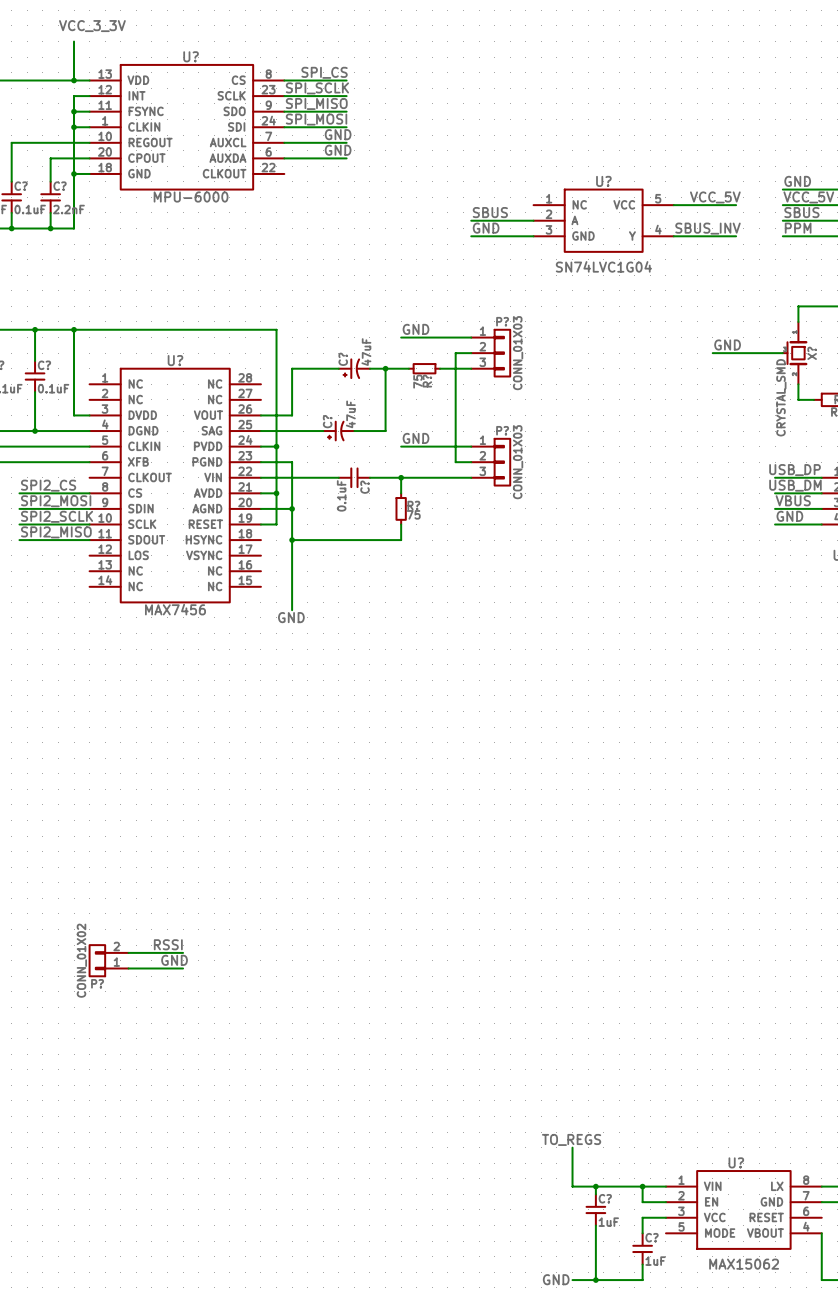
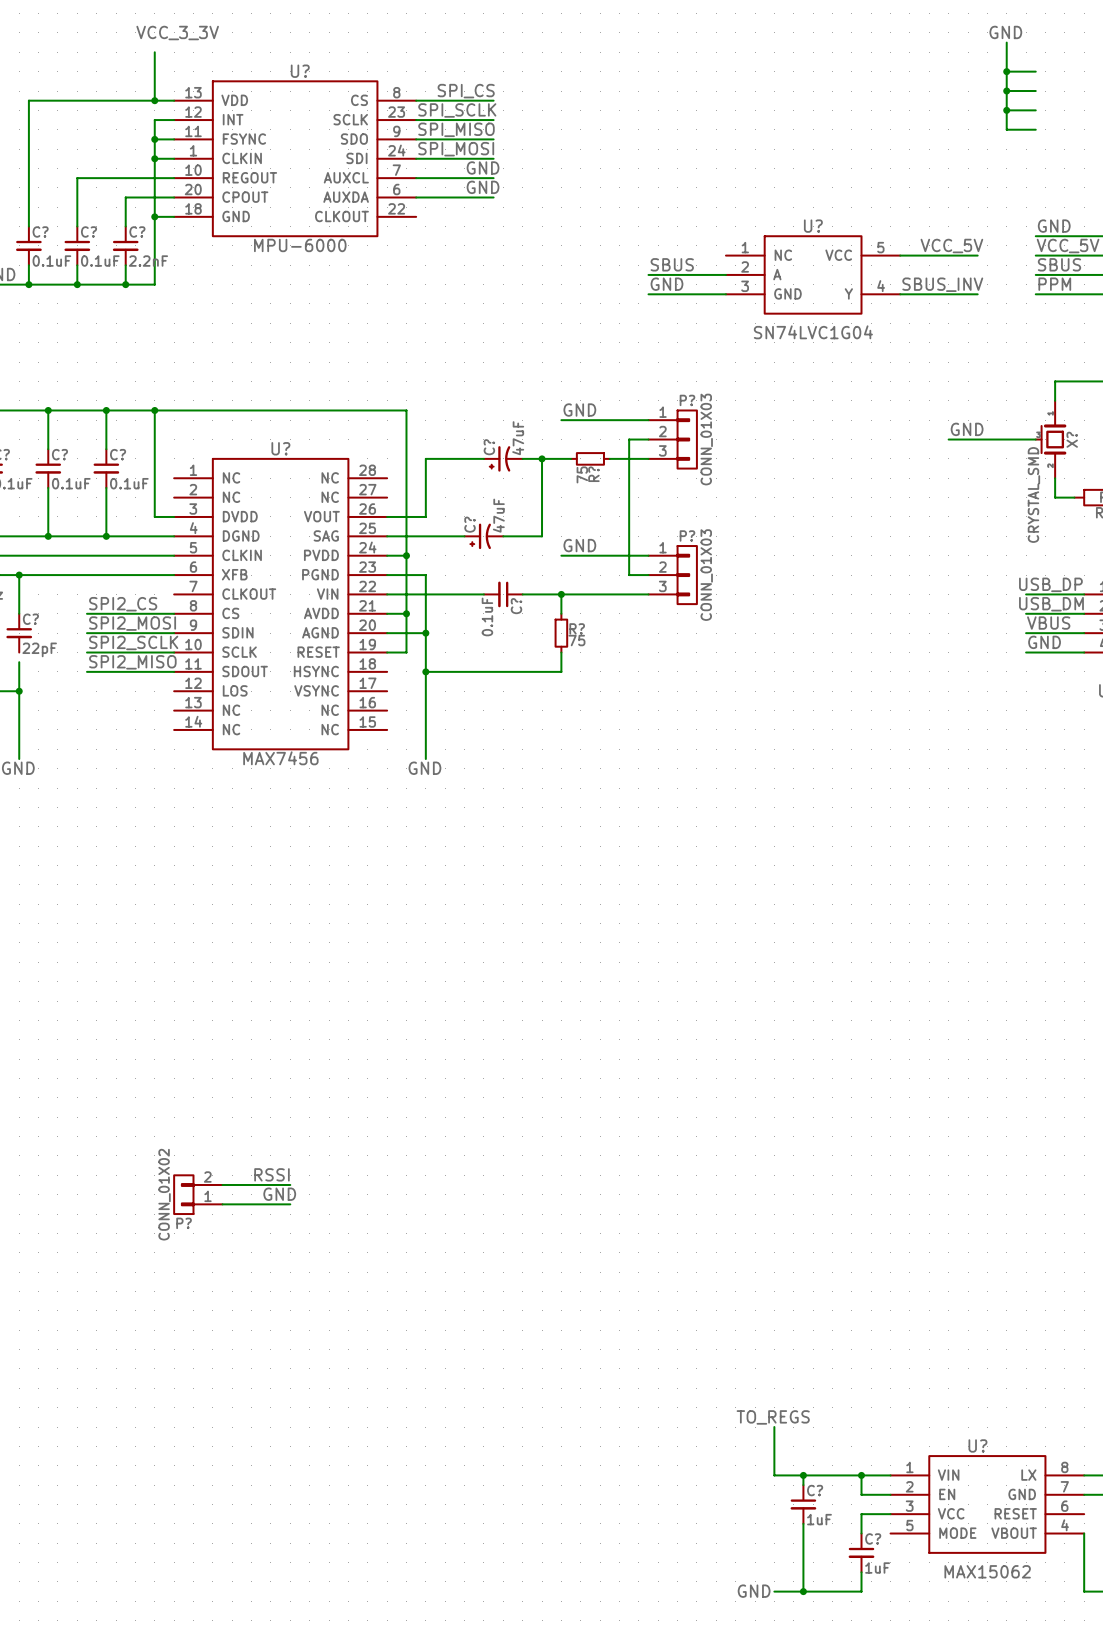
label: none -> GND (1005, 32)
wire: none -> (1006, 42) (1006, 129) (1035, 129)
wire: none -> (1006, 71) (1035, 71)
junction: none -> (1006, 71)
wire: none -> (1006, 91) (1035, 91)
junction: none -> (1006, 91)
wire: none -> (1006, 110) (1035, 110)
junction: none -> (1006, 110)

